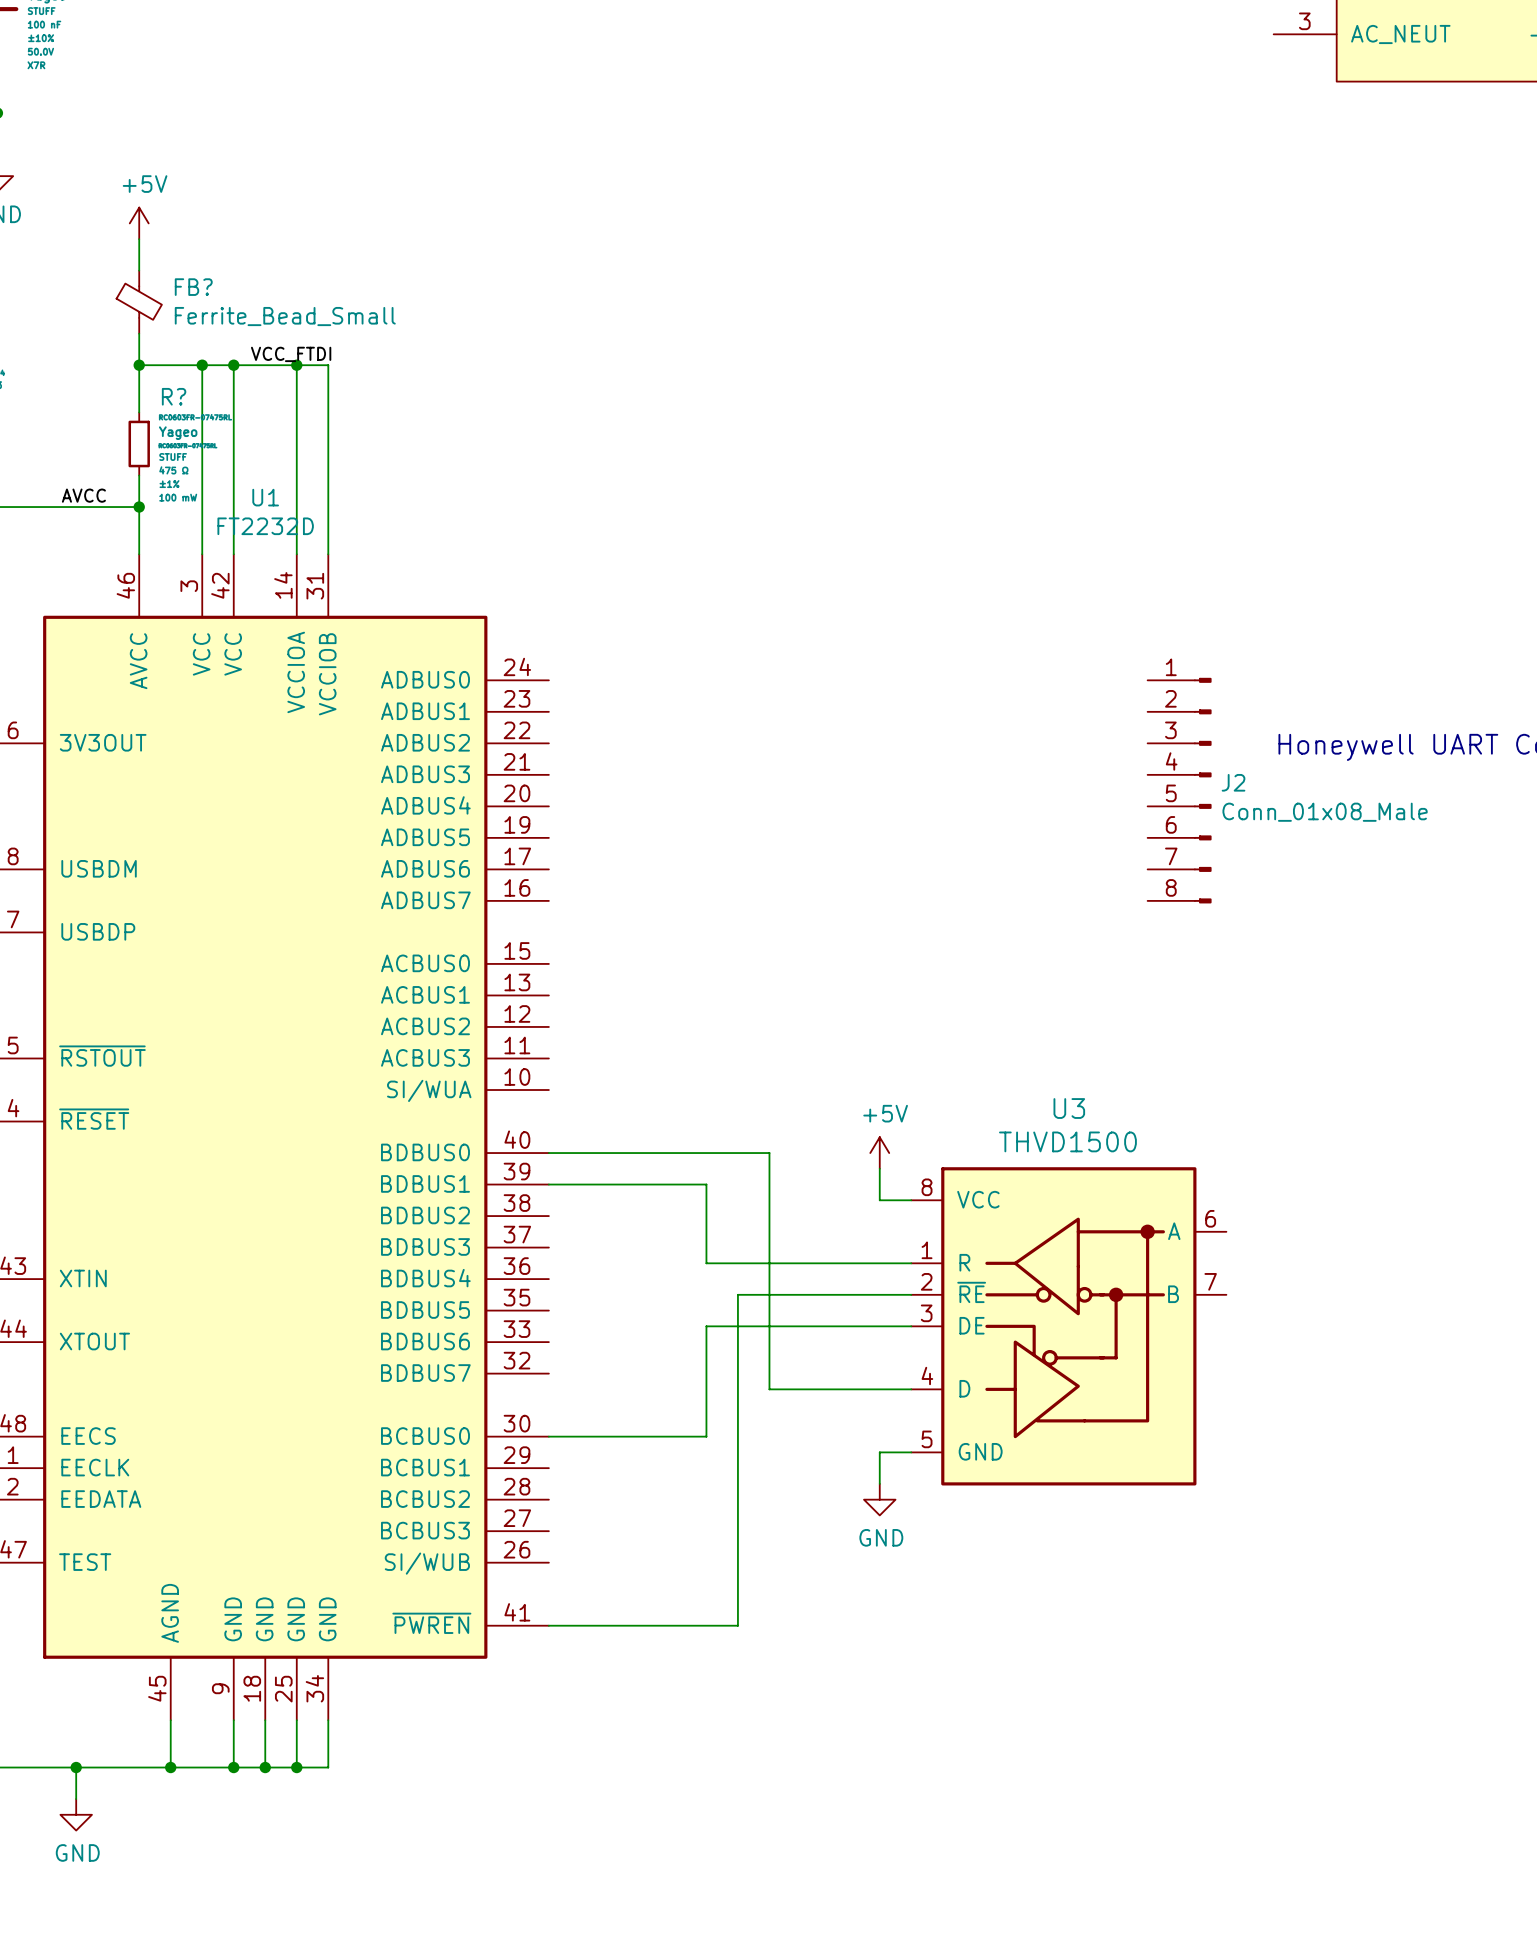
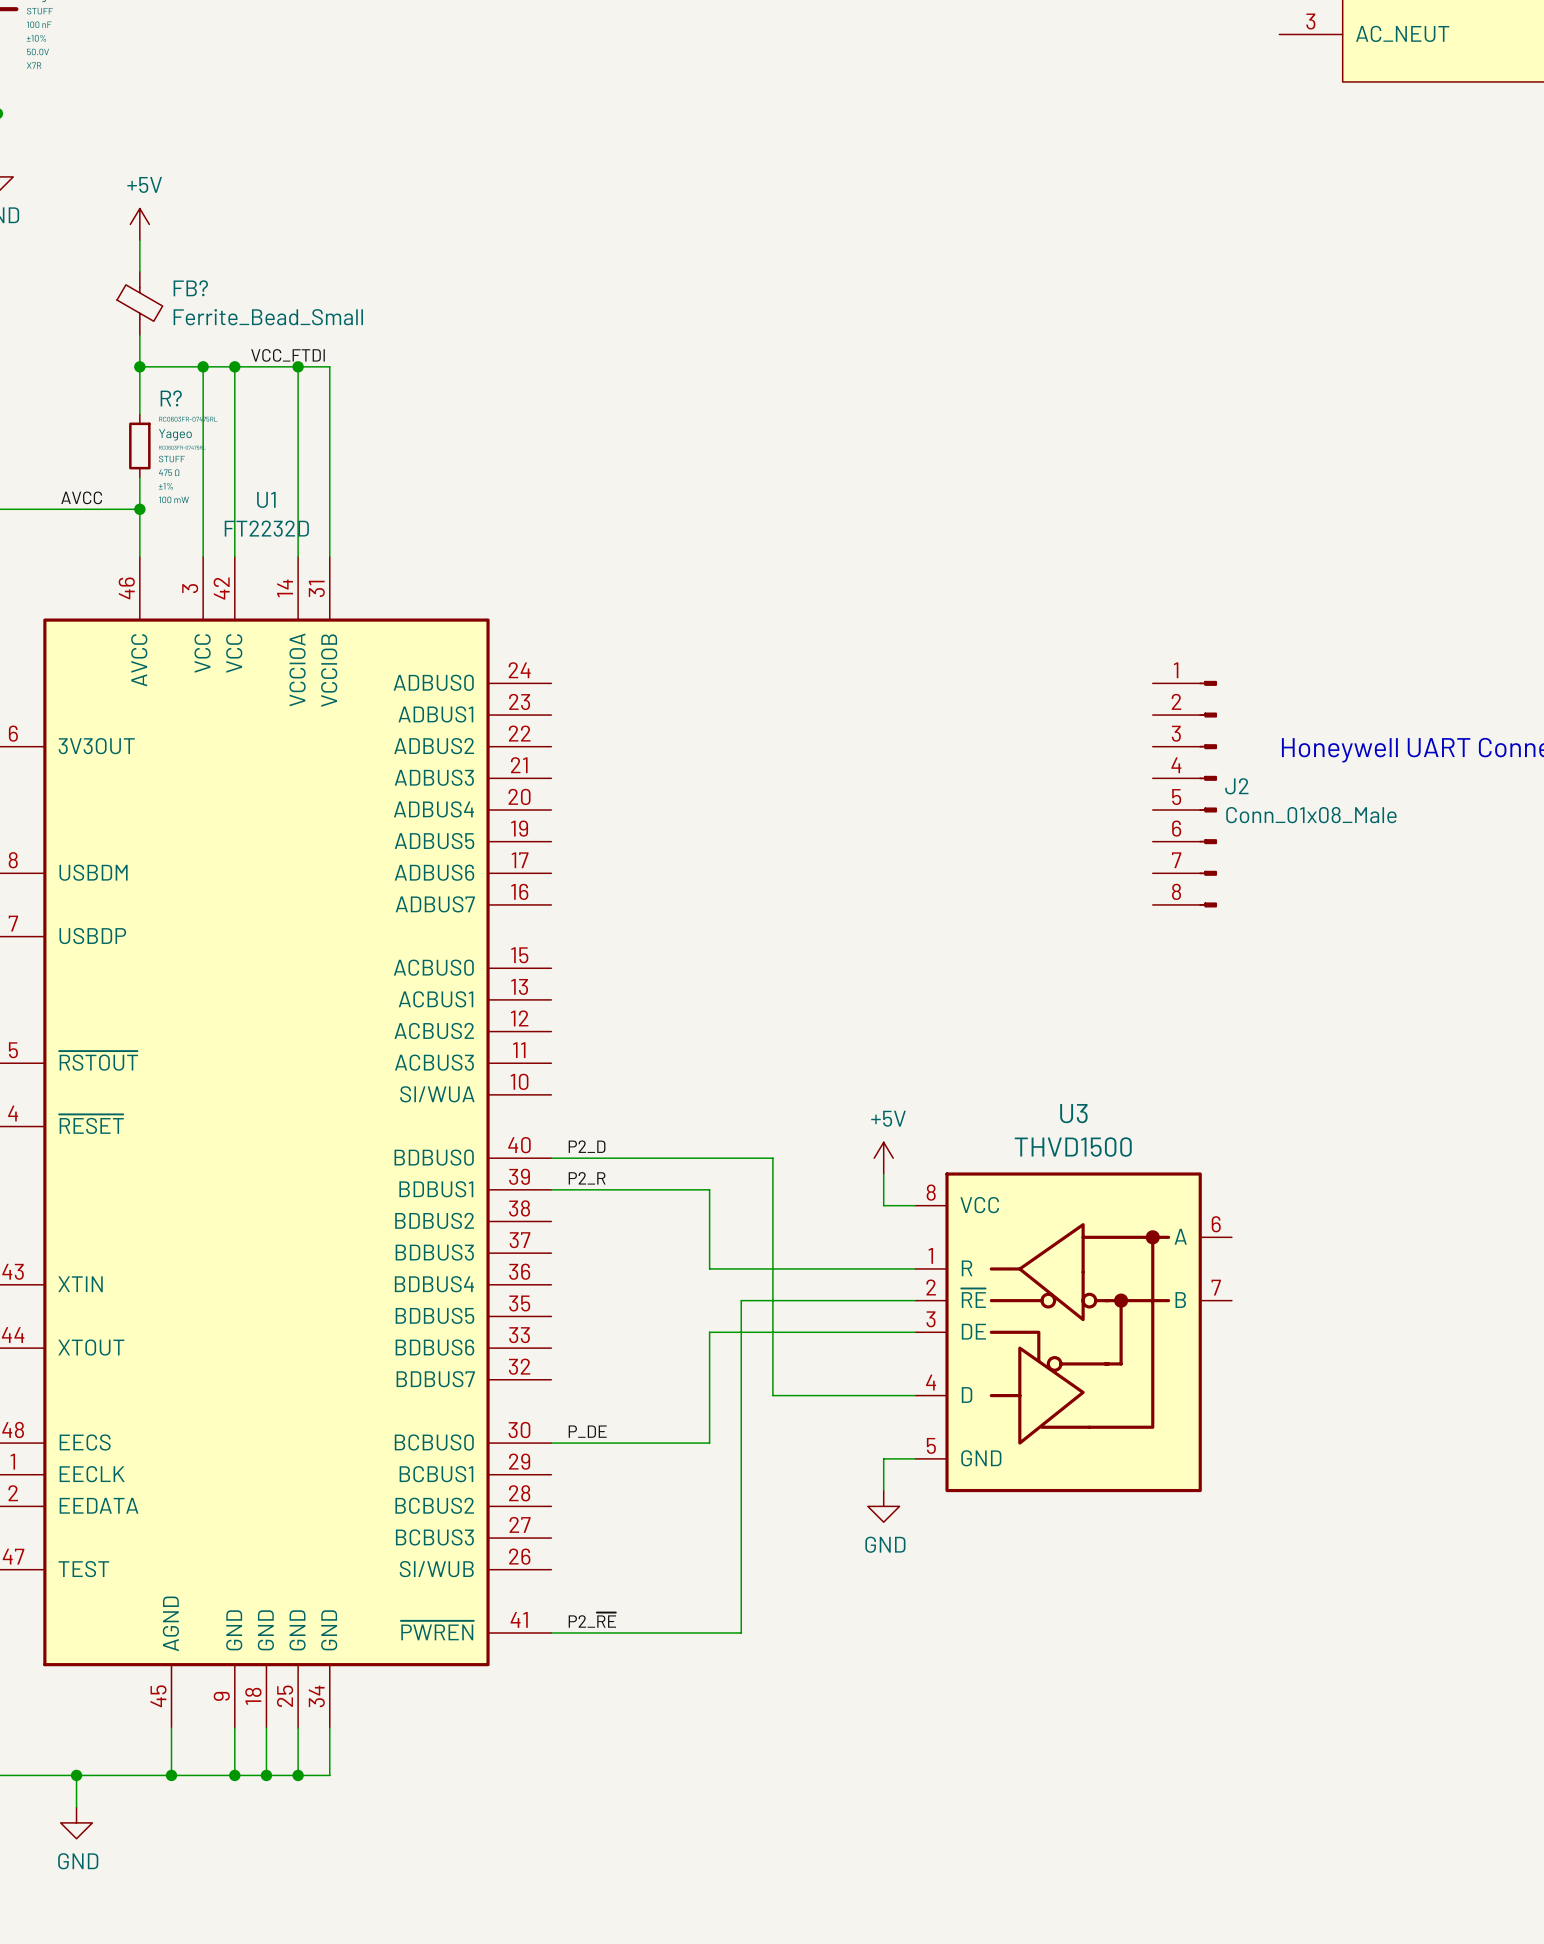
label: none -> P2_D (587, 1146)
label: none -> P2_R (587, 1178)
label: none -> P_DE (587, 1431)
label: none -> P2_~{RE} (592, 1620)

